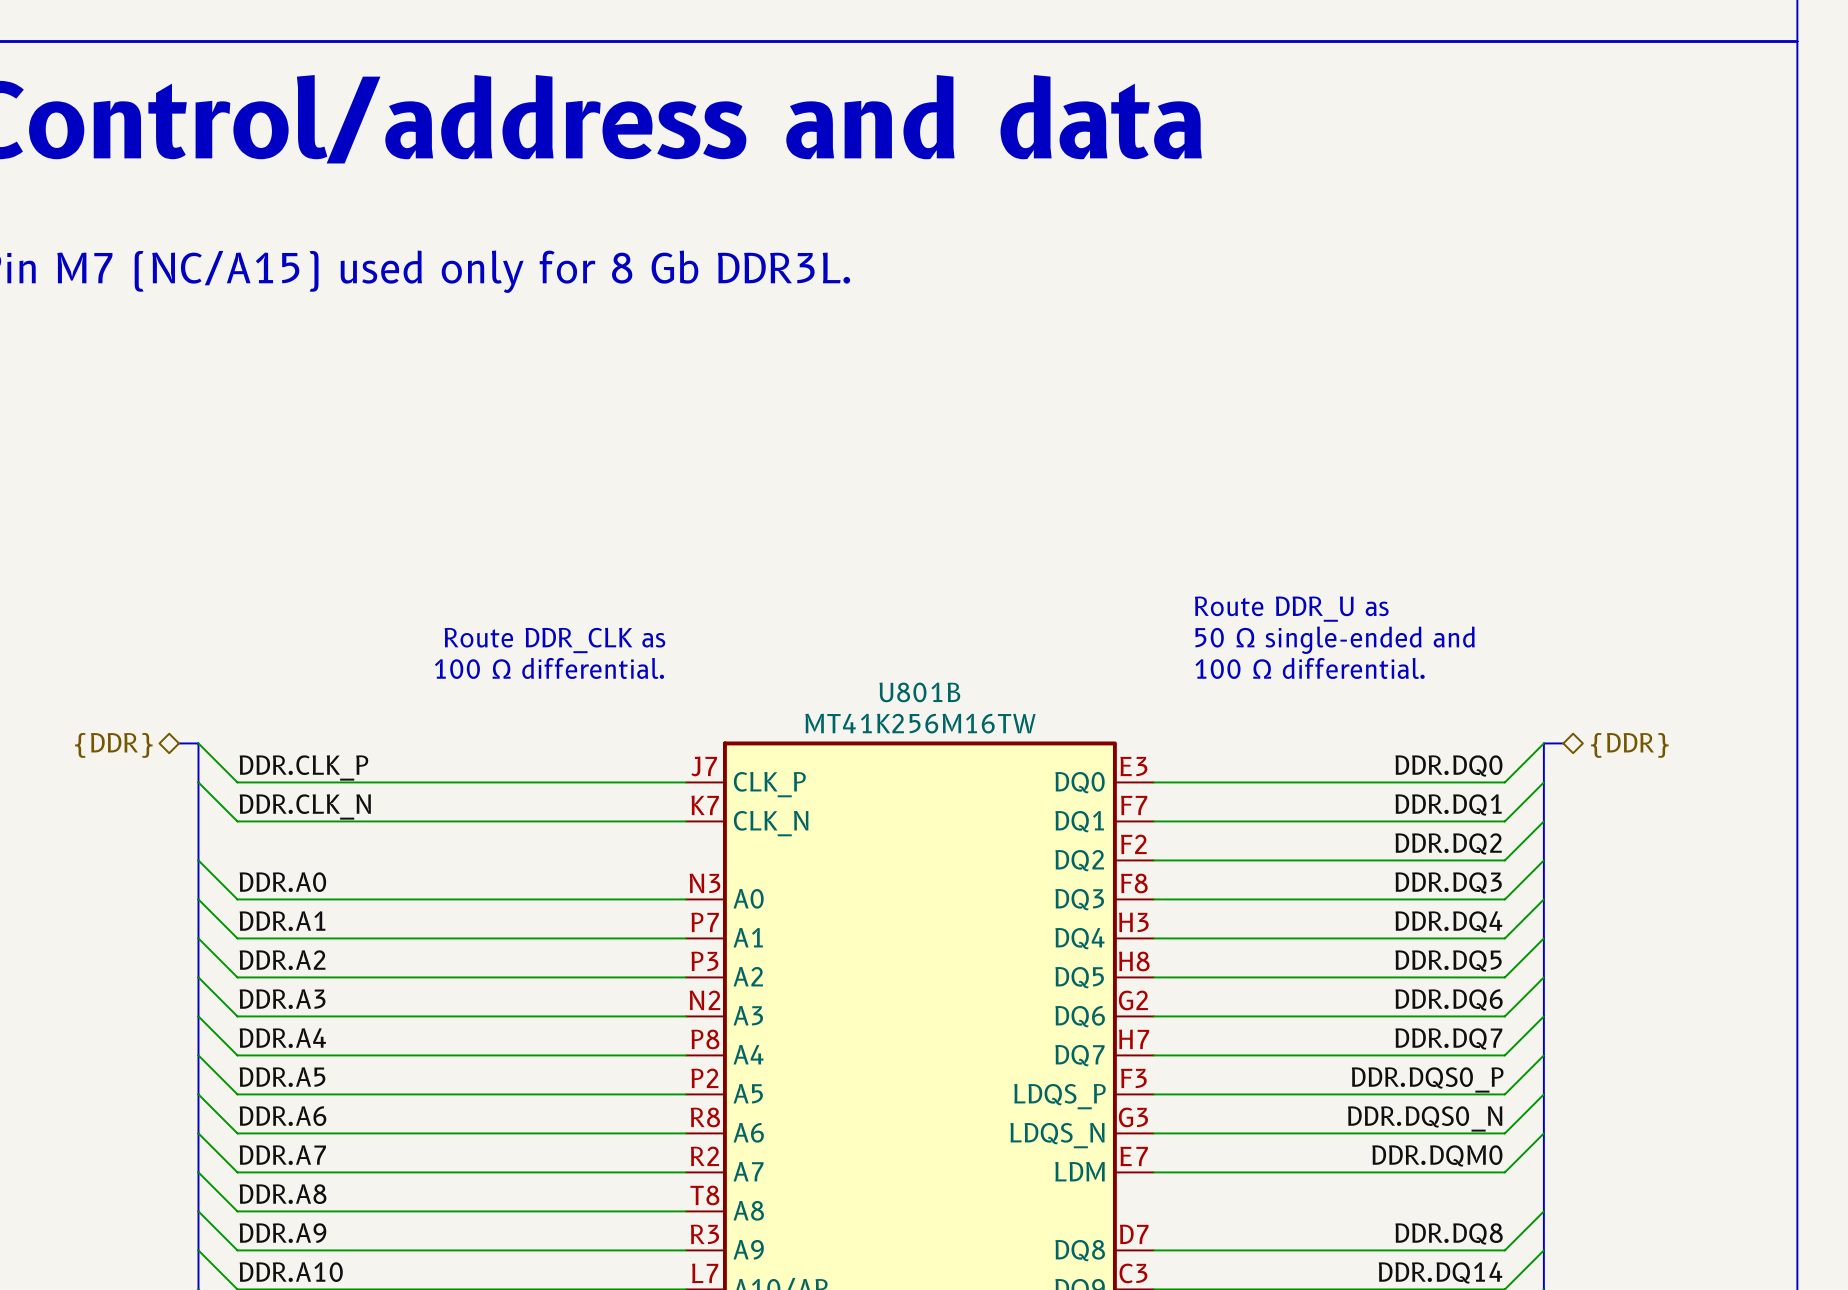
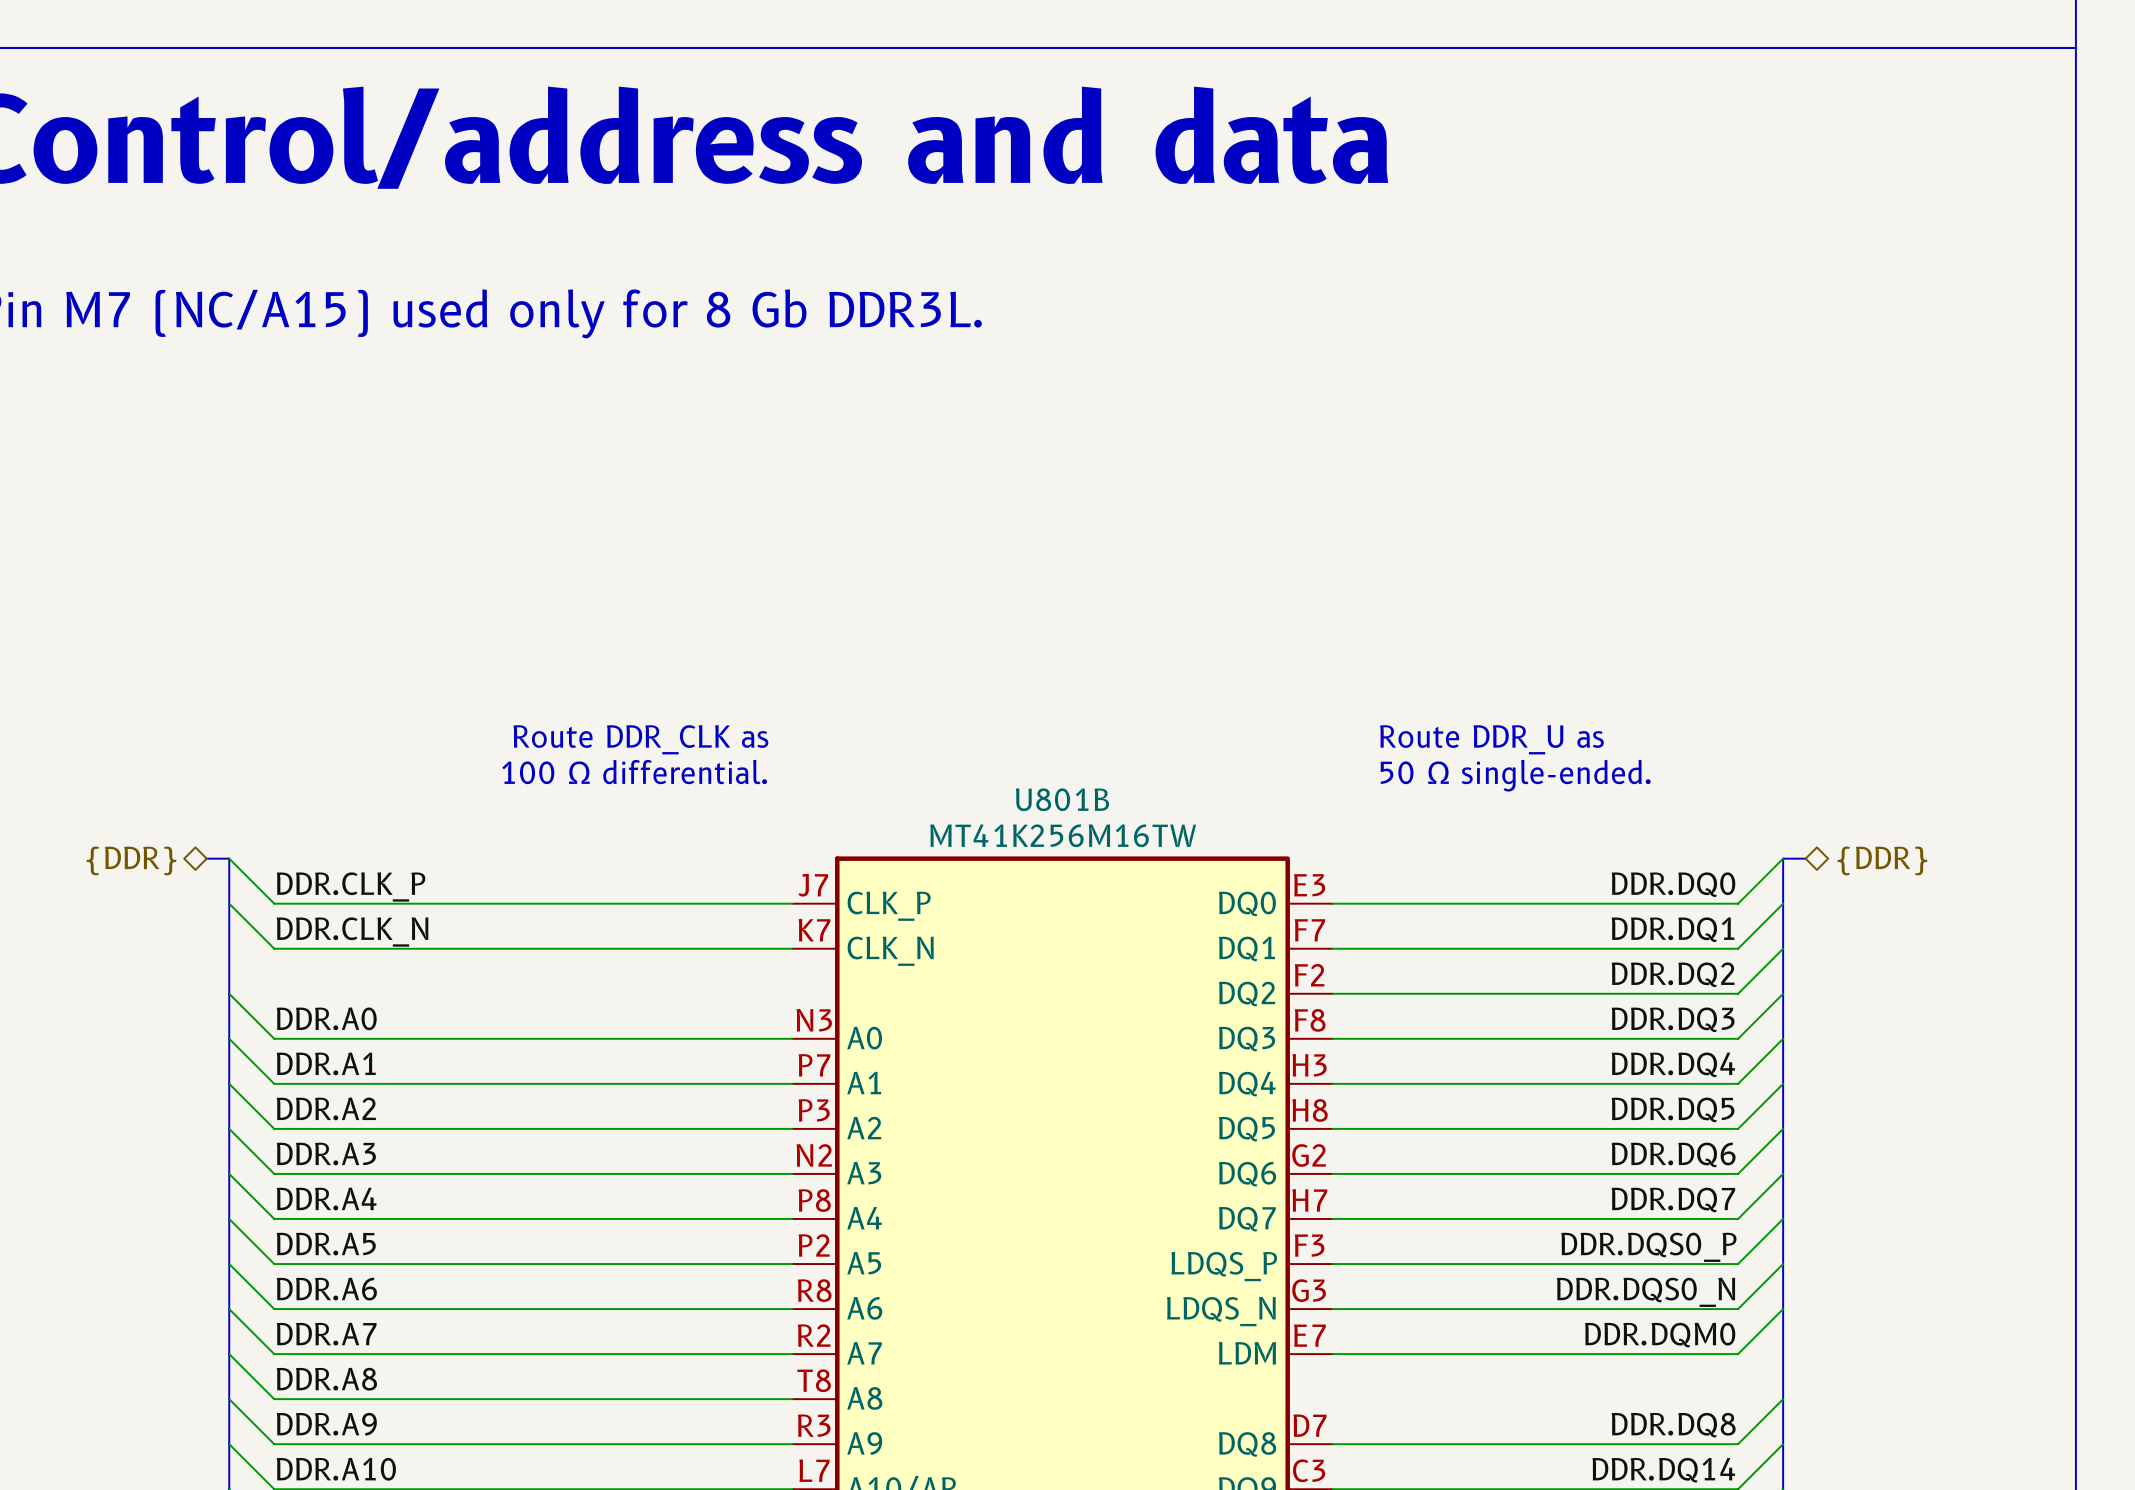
text: Route DDR_U as (1291, 609) -> none
text: 50 Ω single-ended and (1335, 640) -> Route DDR_U as (1491, 739)
text: 100 Ω differential. (1310, 668) -> 50 Ω single-ended. (1515, 775)

